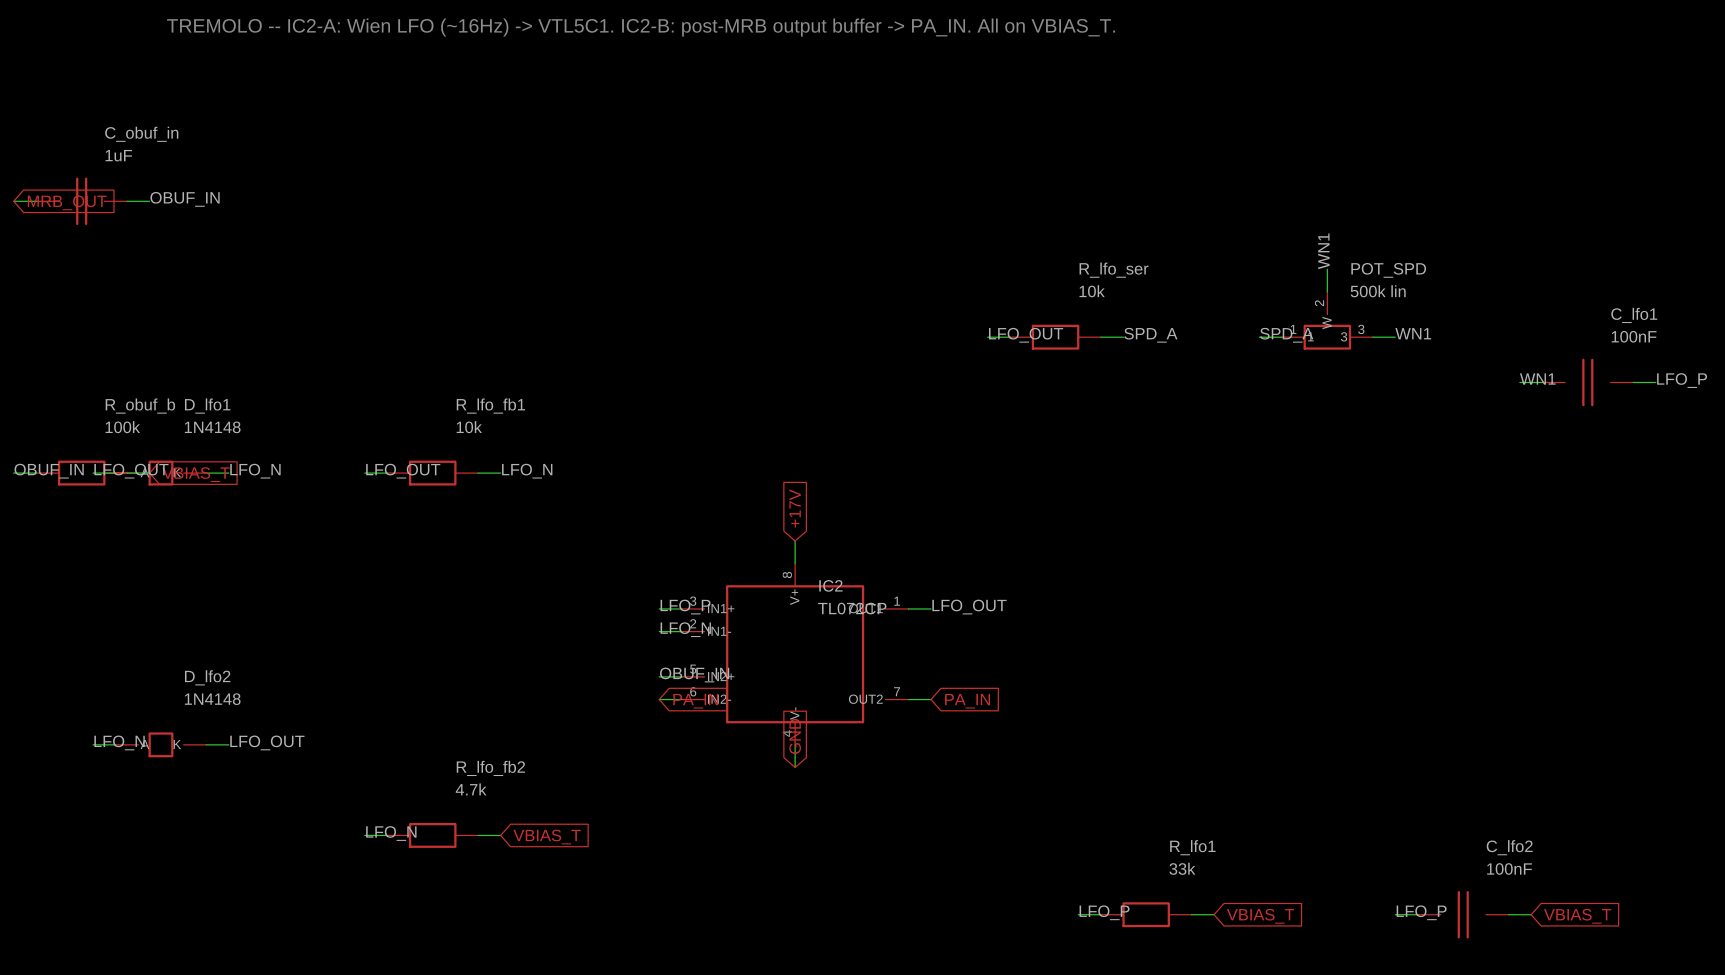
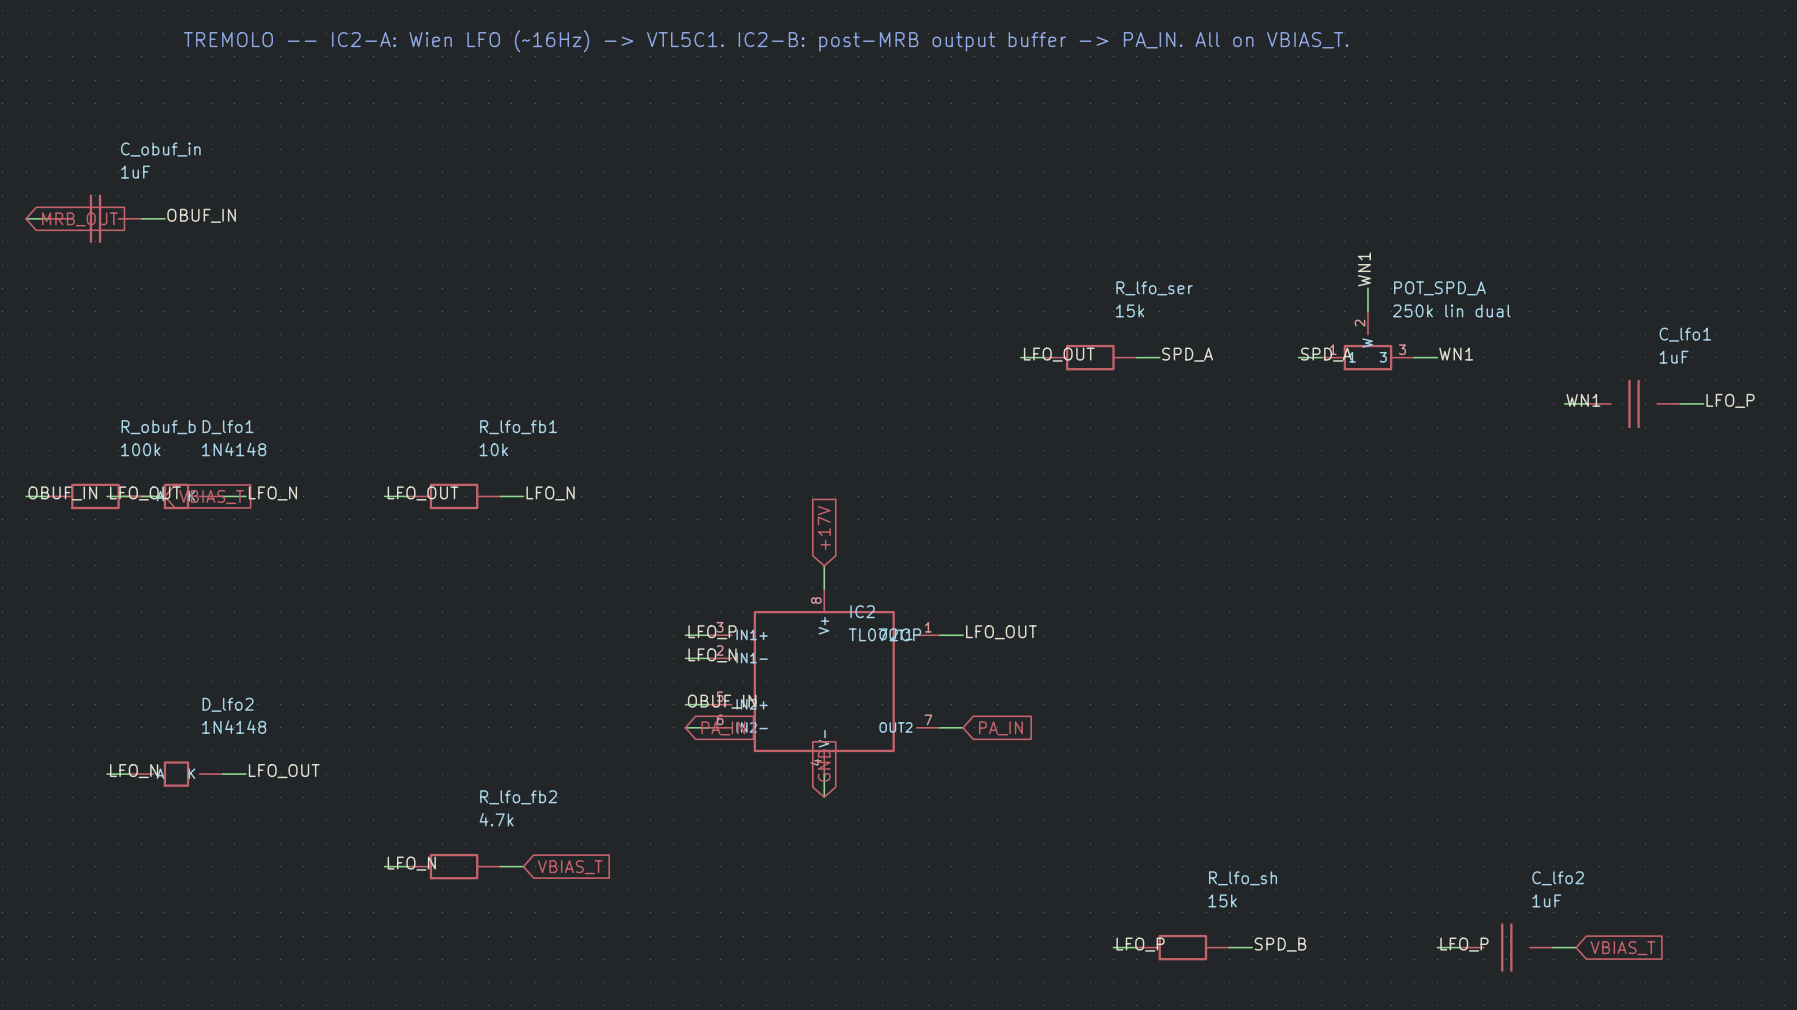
POT_SPD name: POT_SPD (1388, 270) -> POT_SPD_A (1439, 288)
R_lfo_ser value: 10k (1092, 291) -> 15k (1130, 310)
POT_SPD value: 500k lin (1378, 291) -> 250k lin dual (1451, 310)
C_lfo1 value: 100nF (1634, 336) -> 1uF (1674, 357)
R_lfo1 name: R_lfo1 (1192, 847) -> R_lfo_sh (1243, 878)
R_lfo1 value: 33k (1182, 868) -> 15k (1222, 900)
C_lfo2 value: 100nF (1509, 869) -> 1uF (1546, 900)
label: none -> SPD_B (1280, 944)
global label: VBIAS_T (1260, 916) -> none

